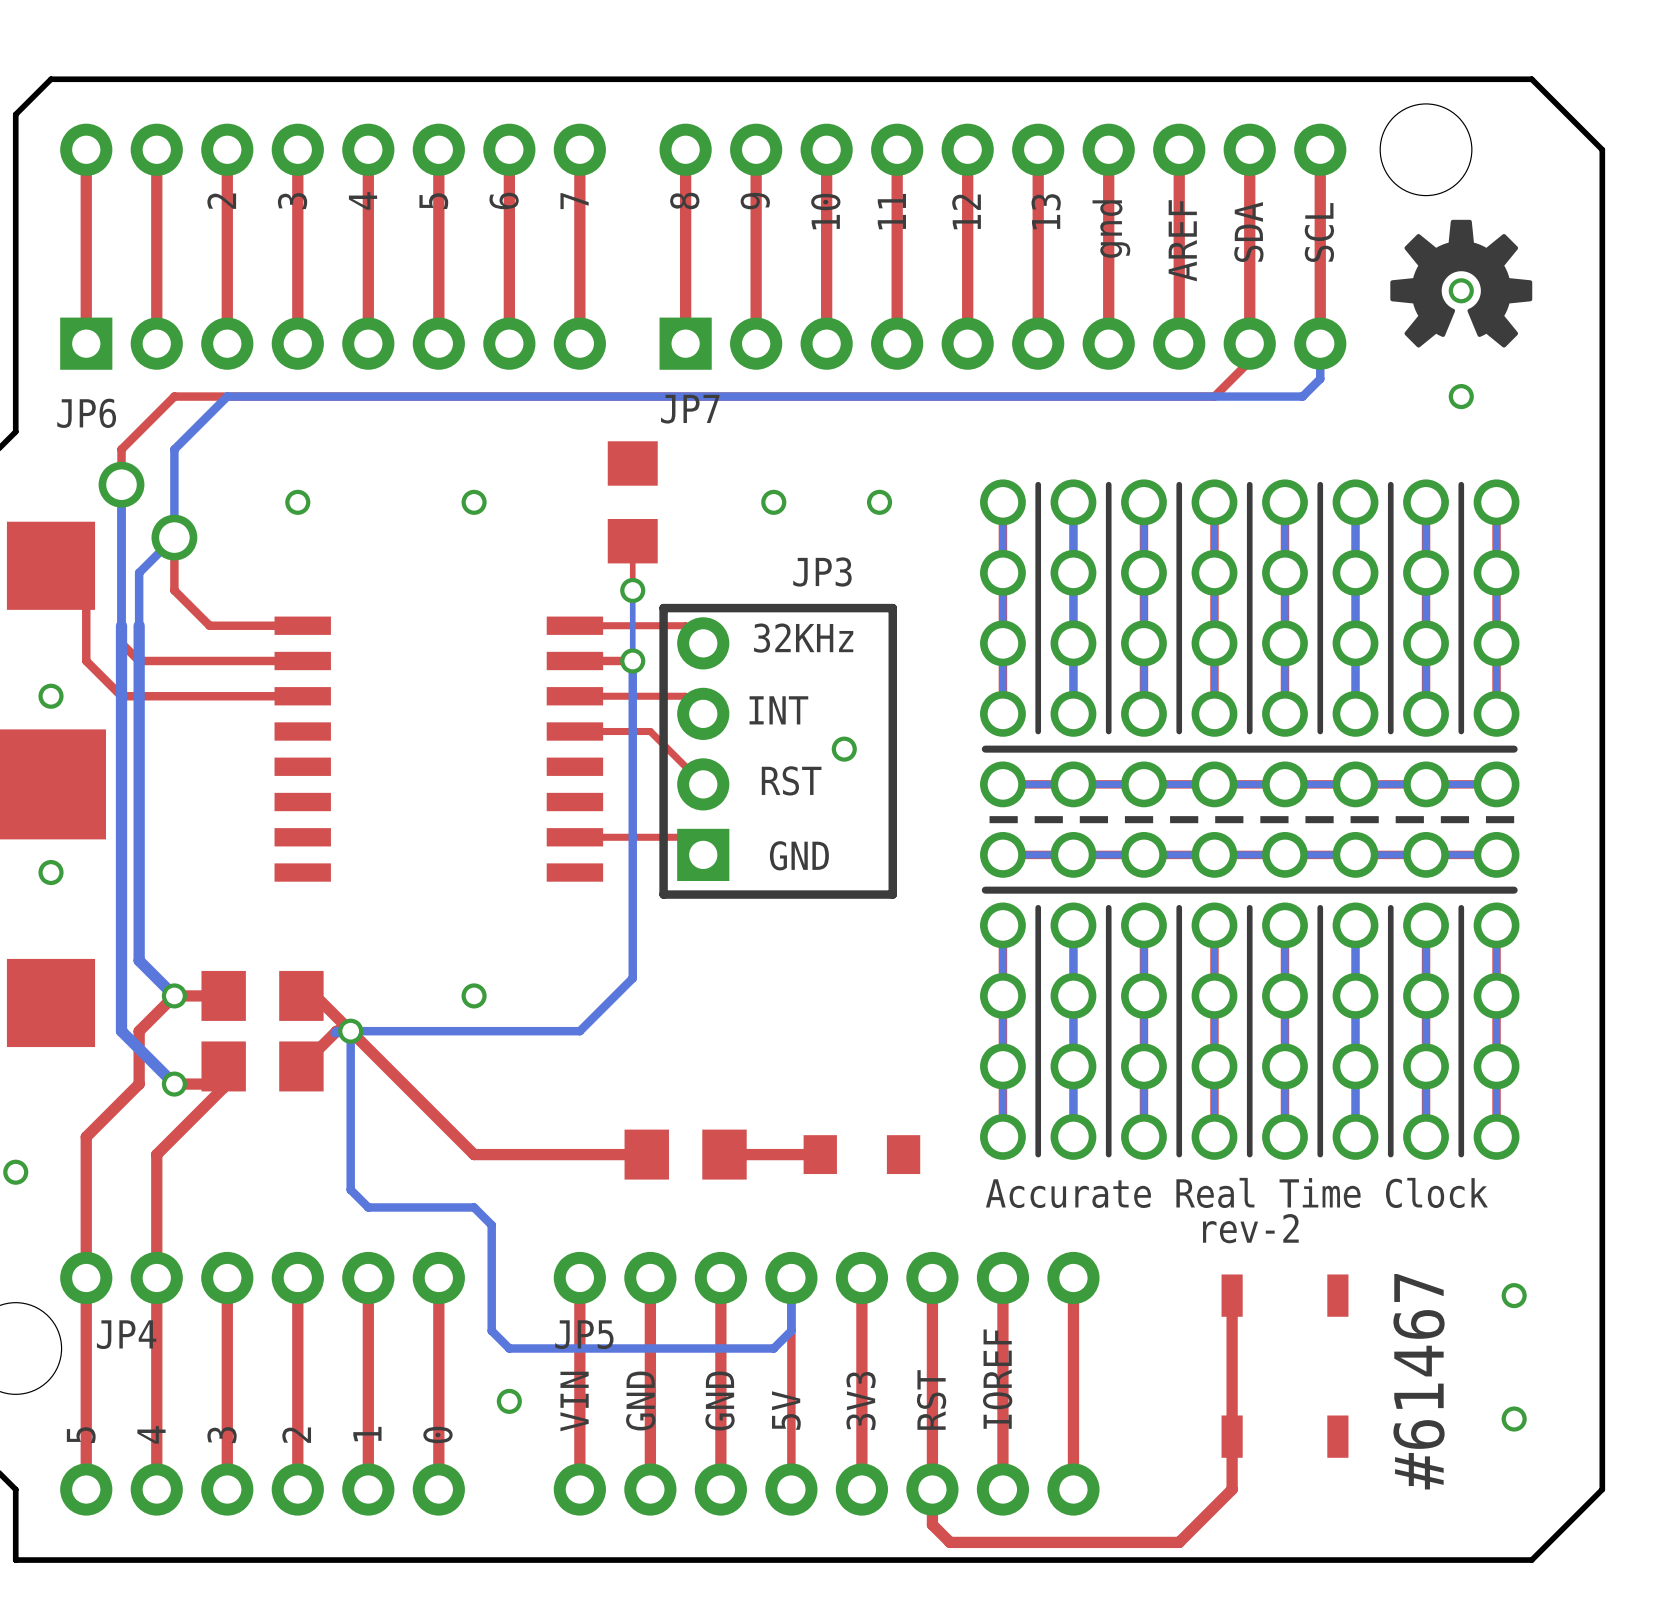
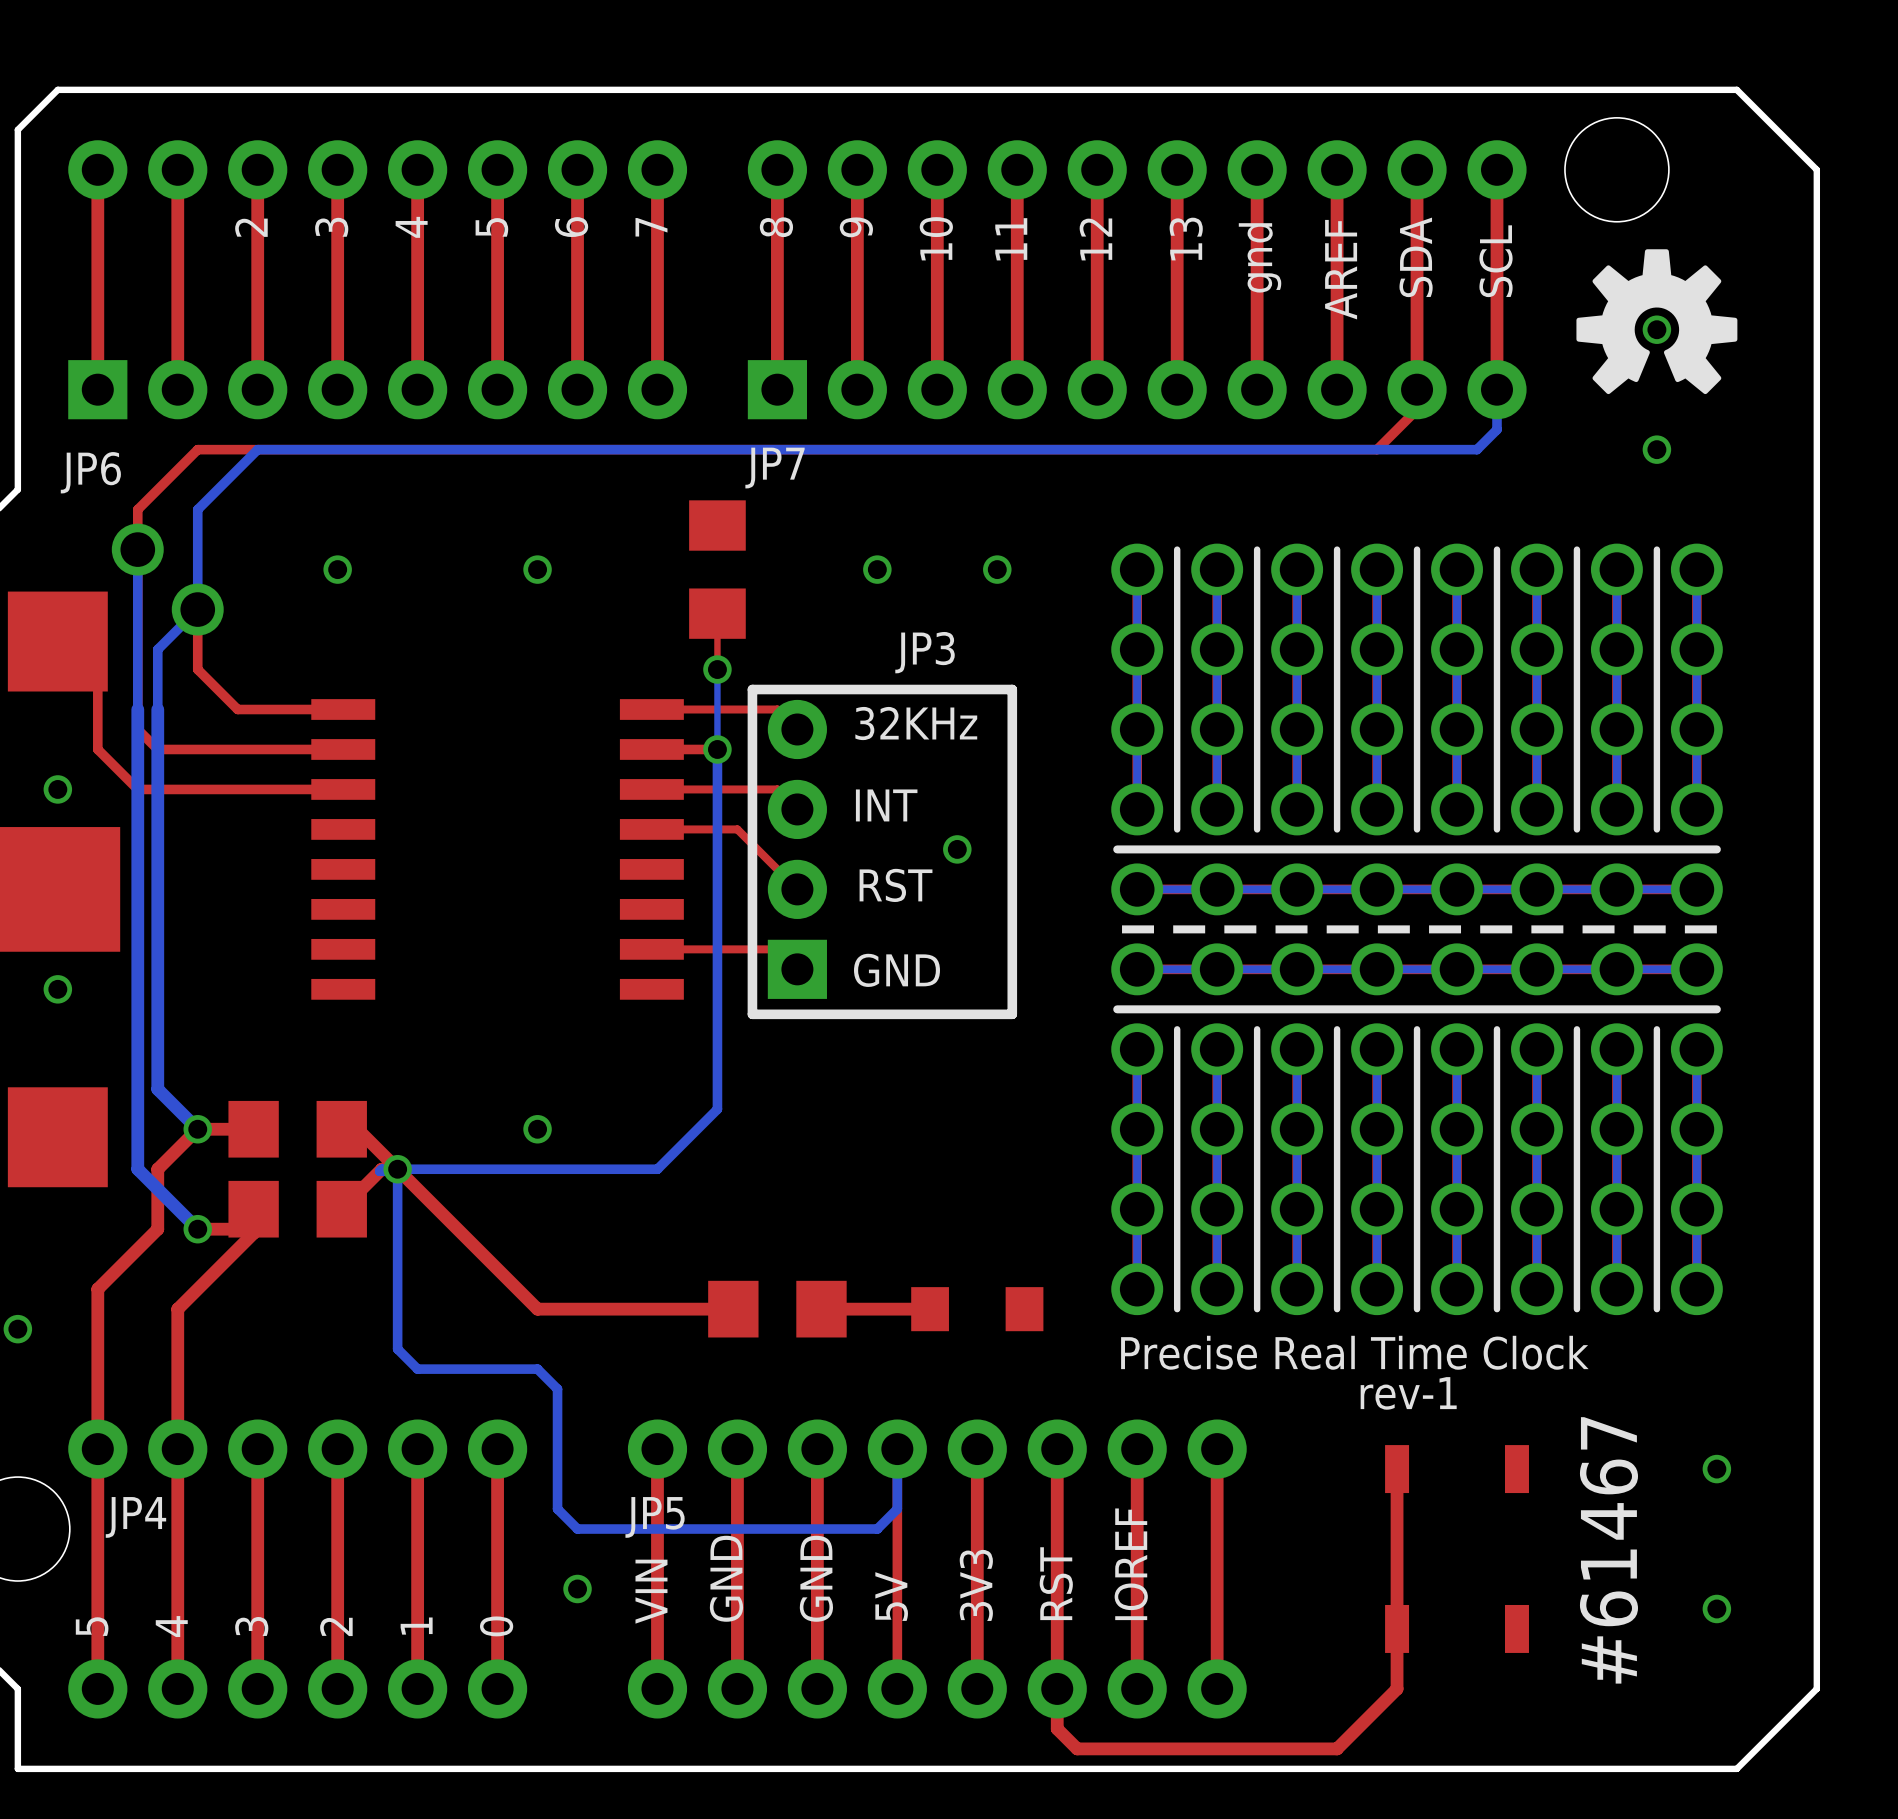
text: Accurate Real Time Clock (1236, 1192) -> Precise Real Time Clock (1354, 1352)
text: rev-2 (1250, 1228) -> rev-1 (1408, 1393)

